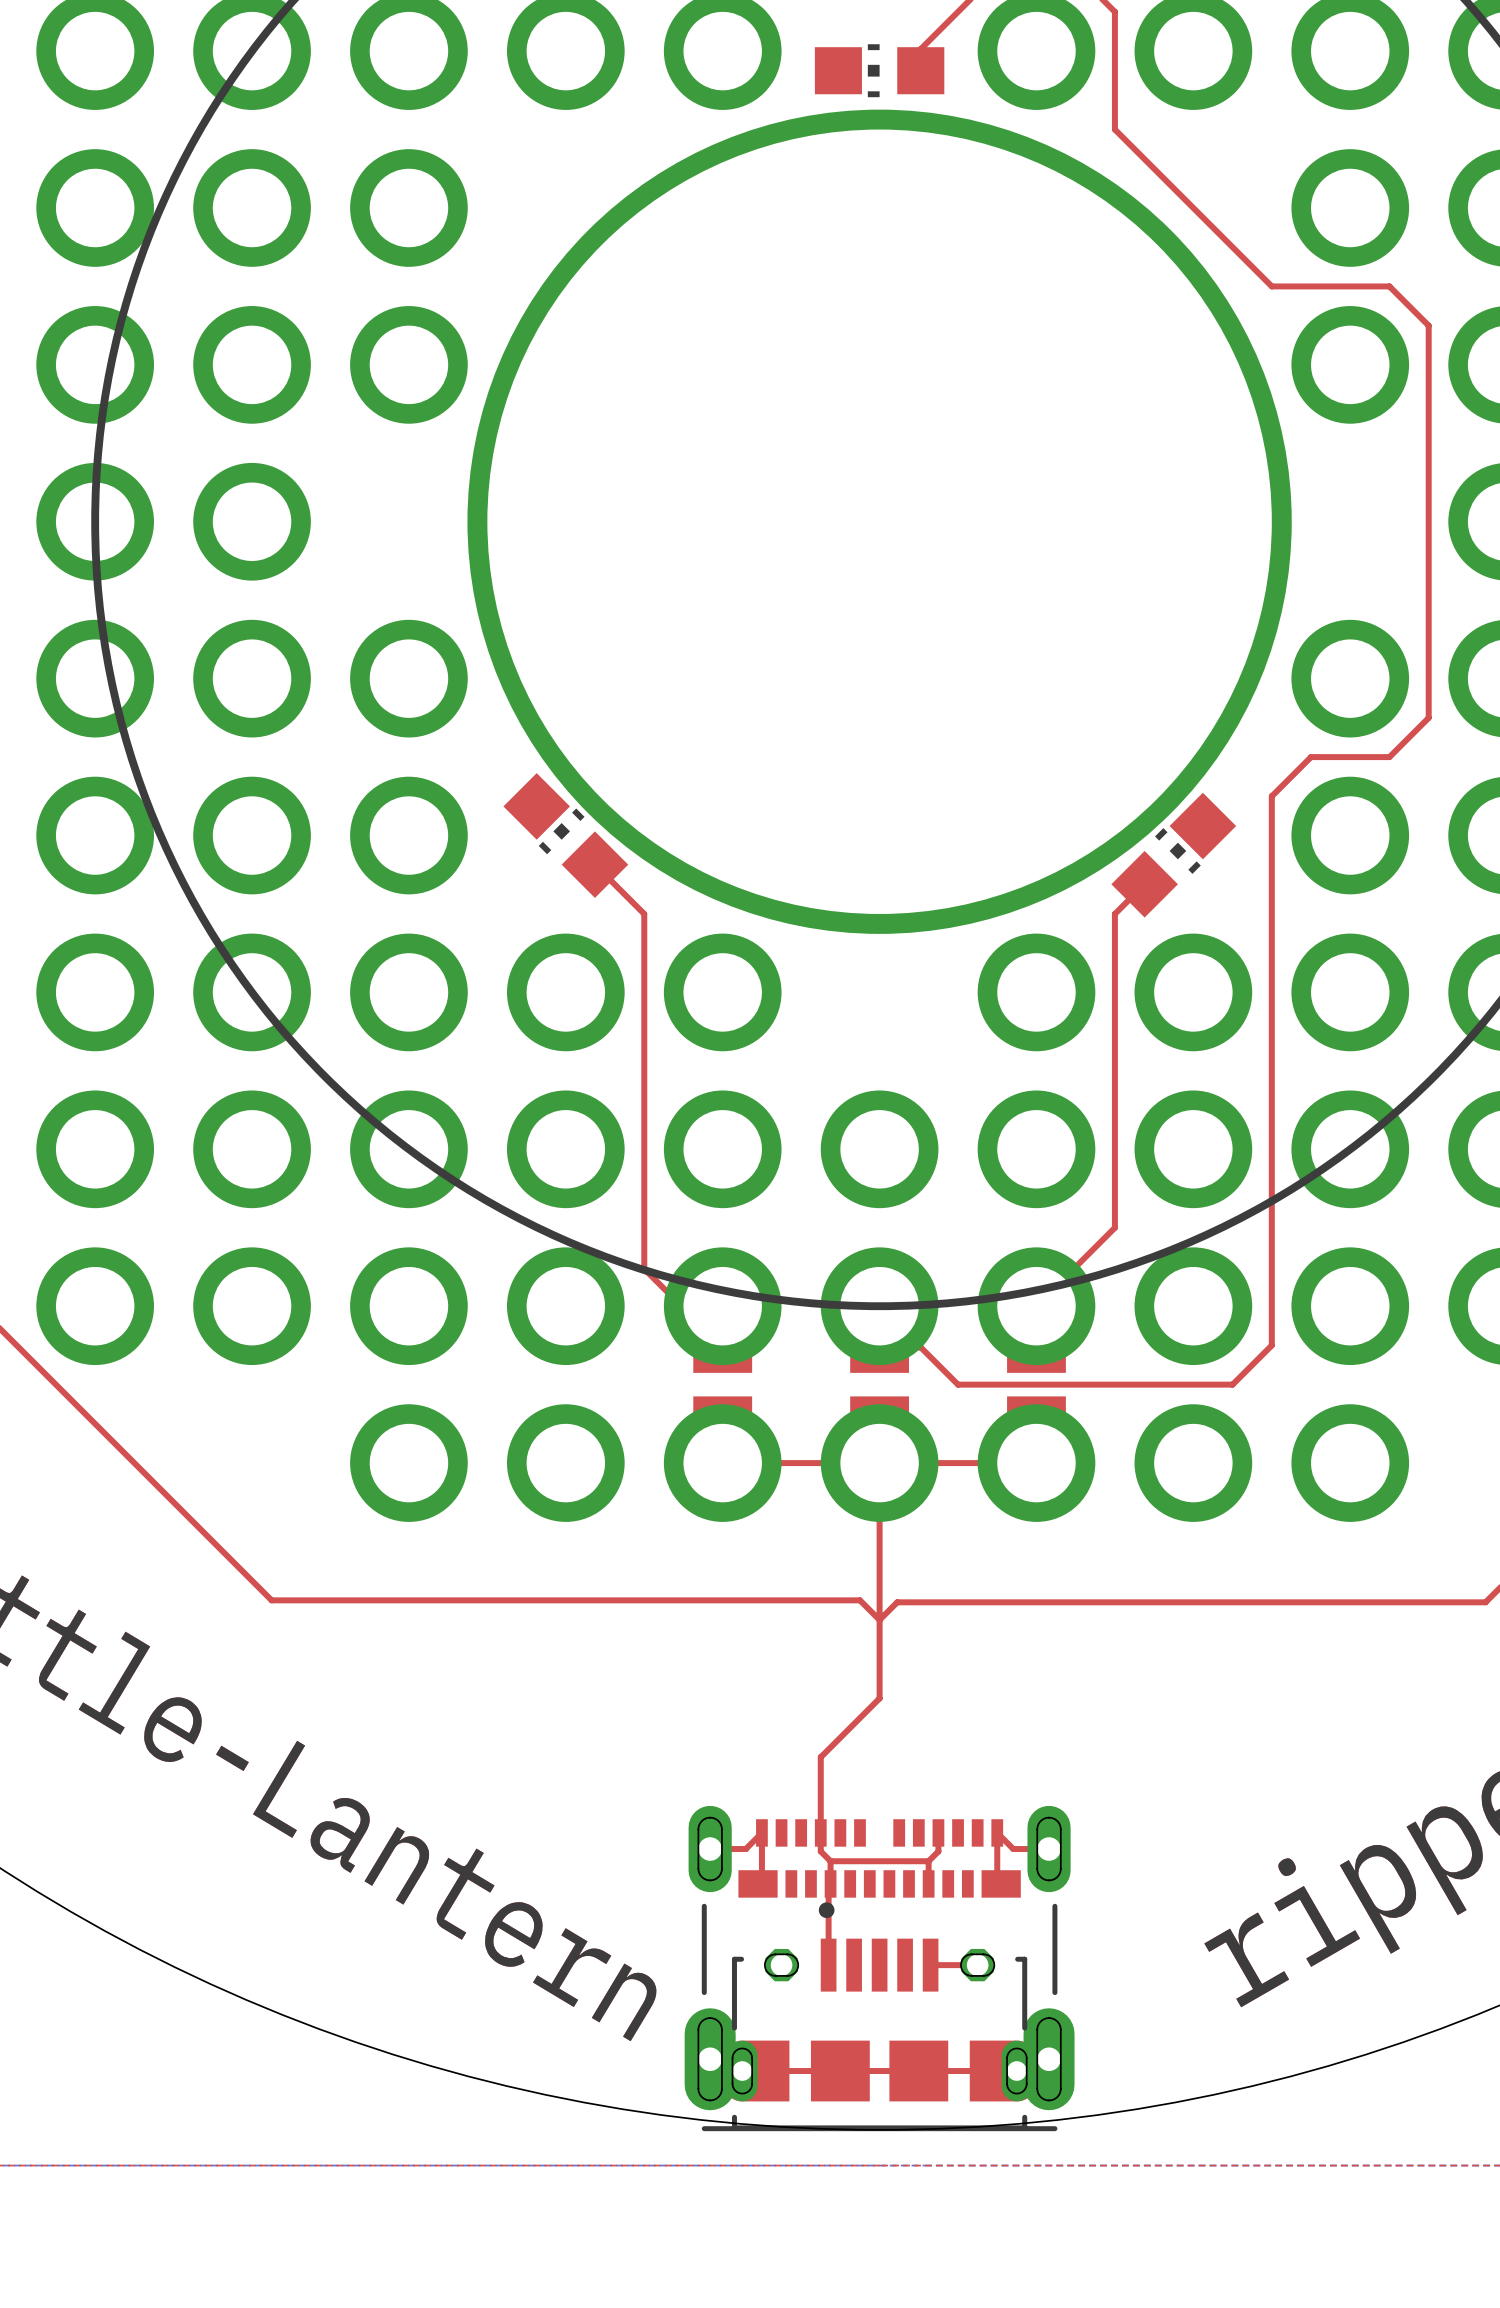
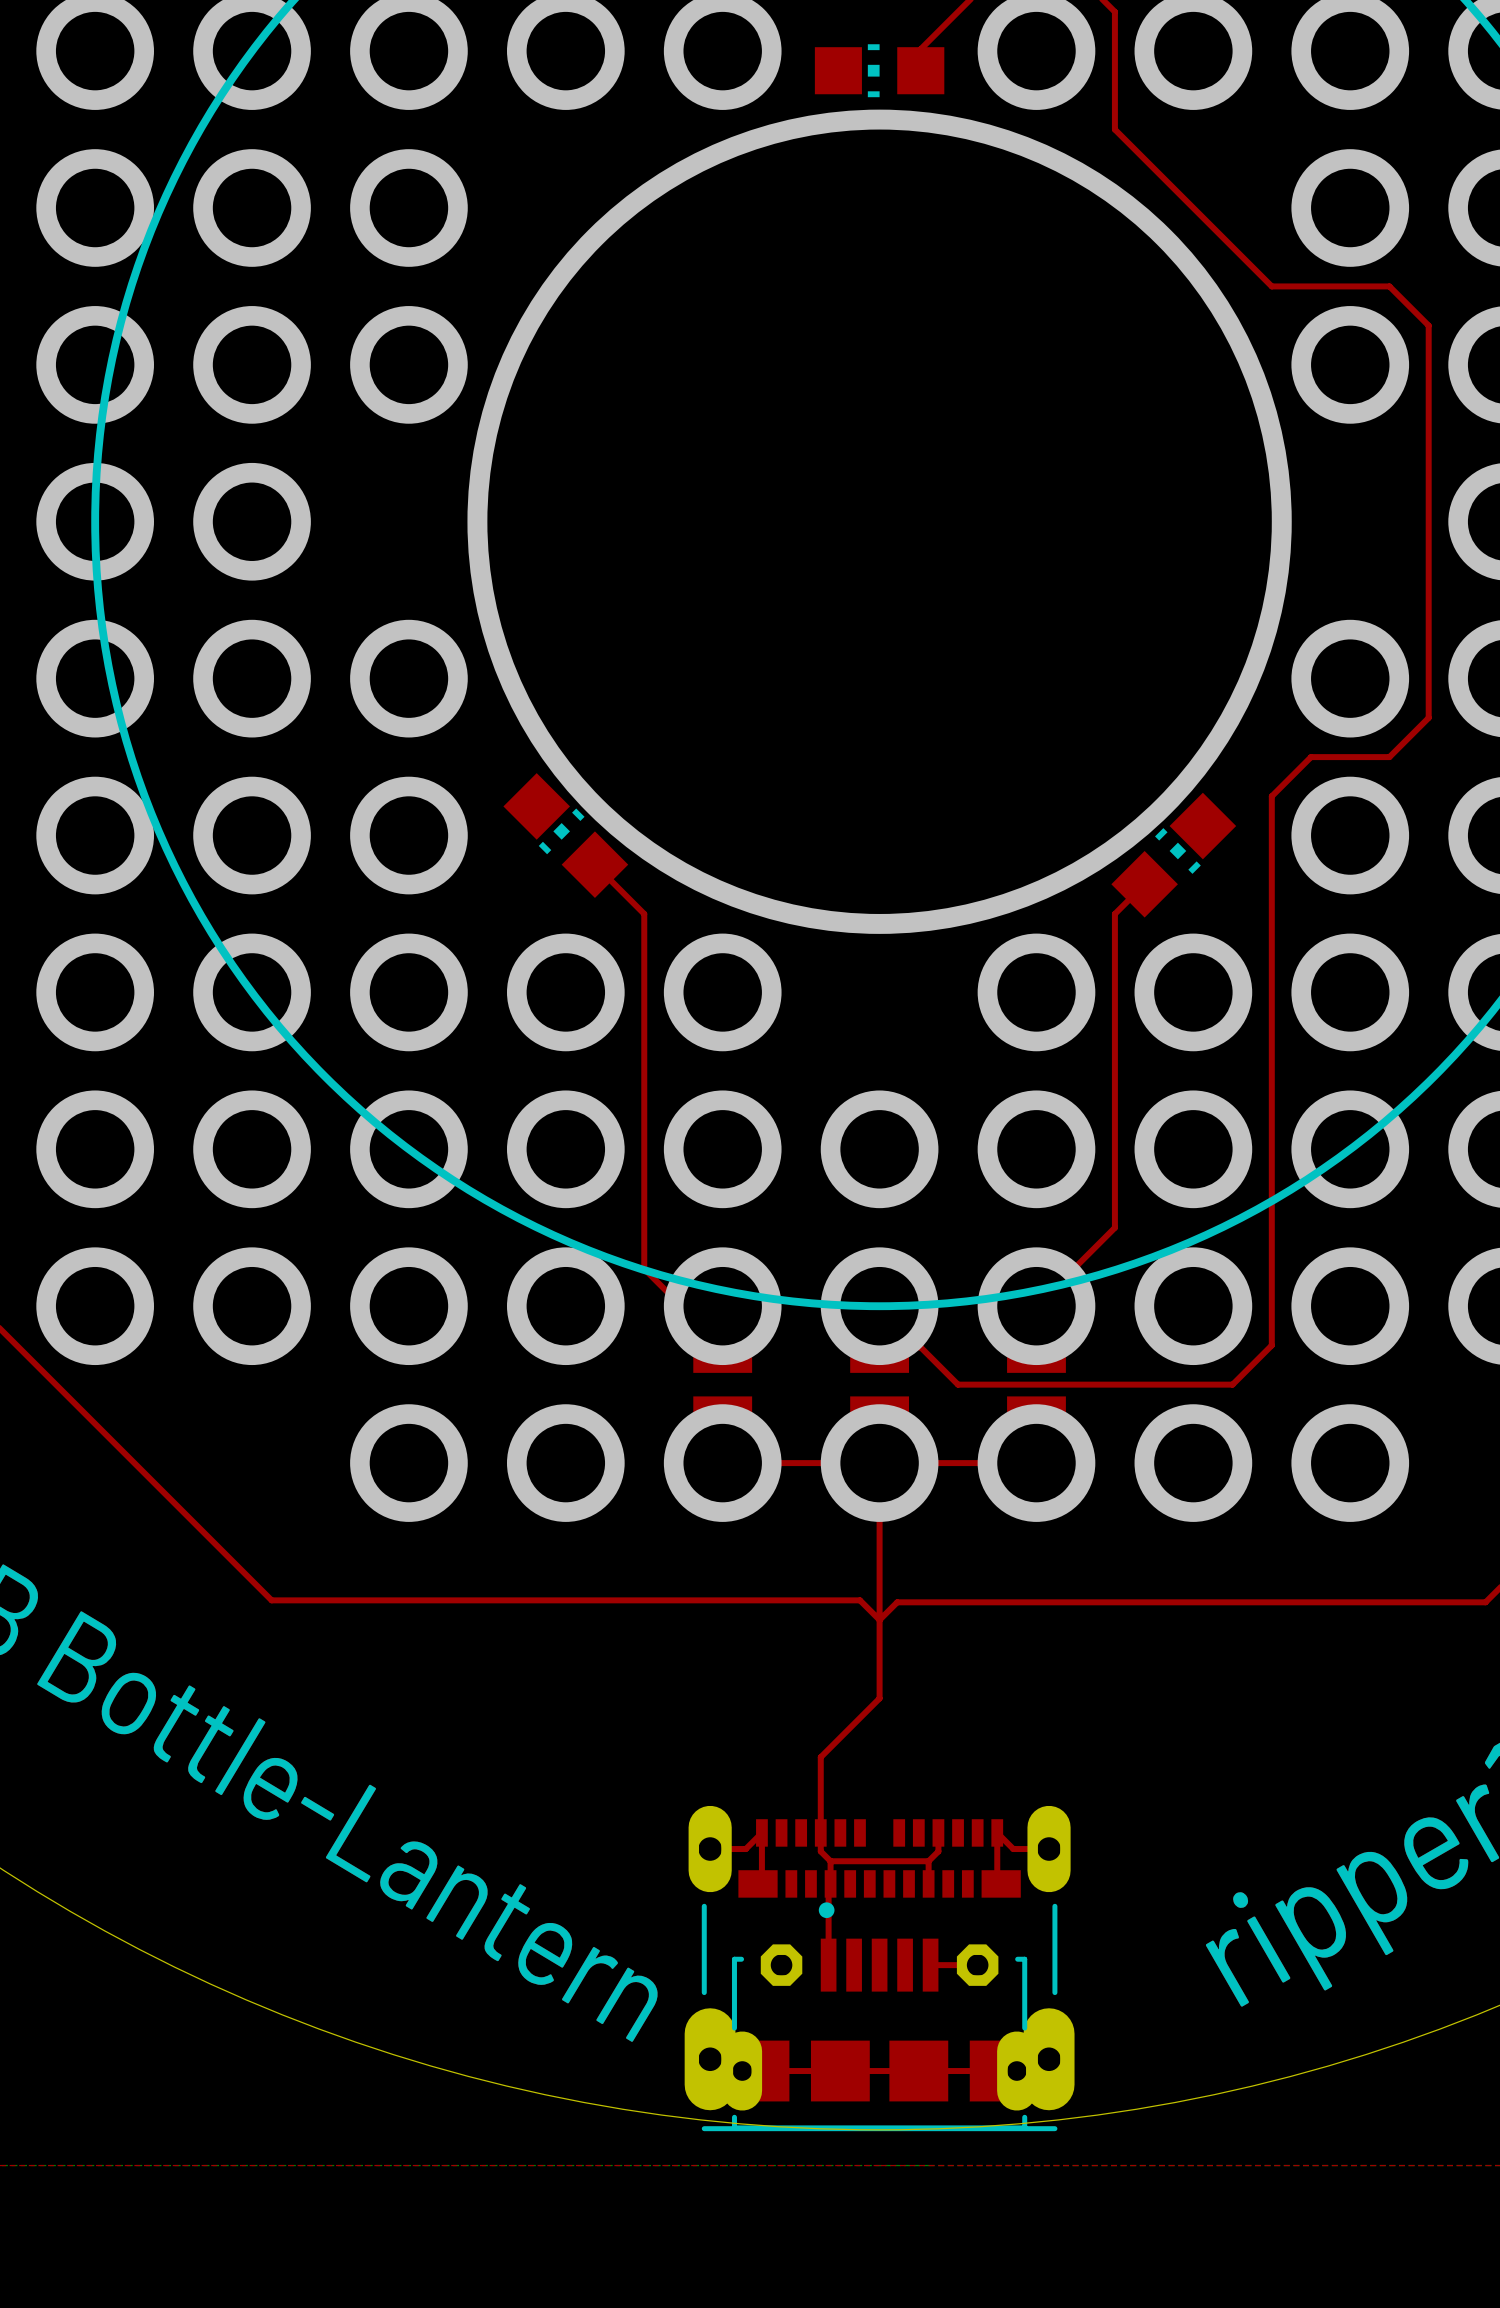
part footprint: [722, 1902, 1037, 2131] -> [722, 1902, 1037, 2131]

